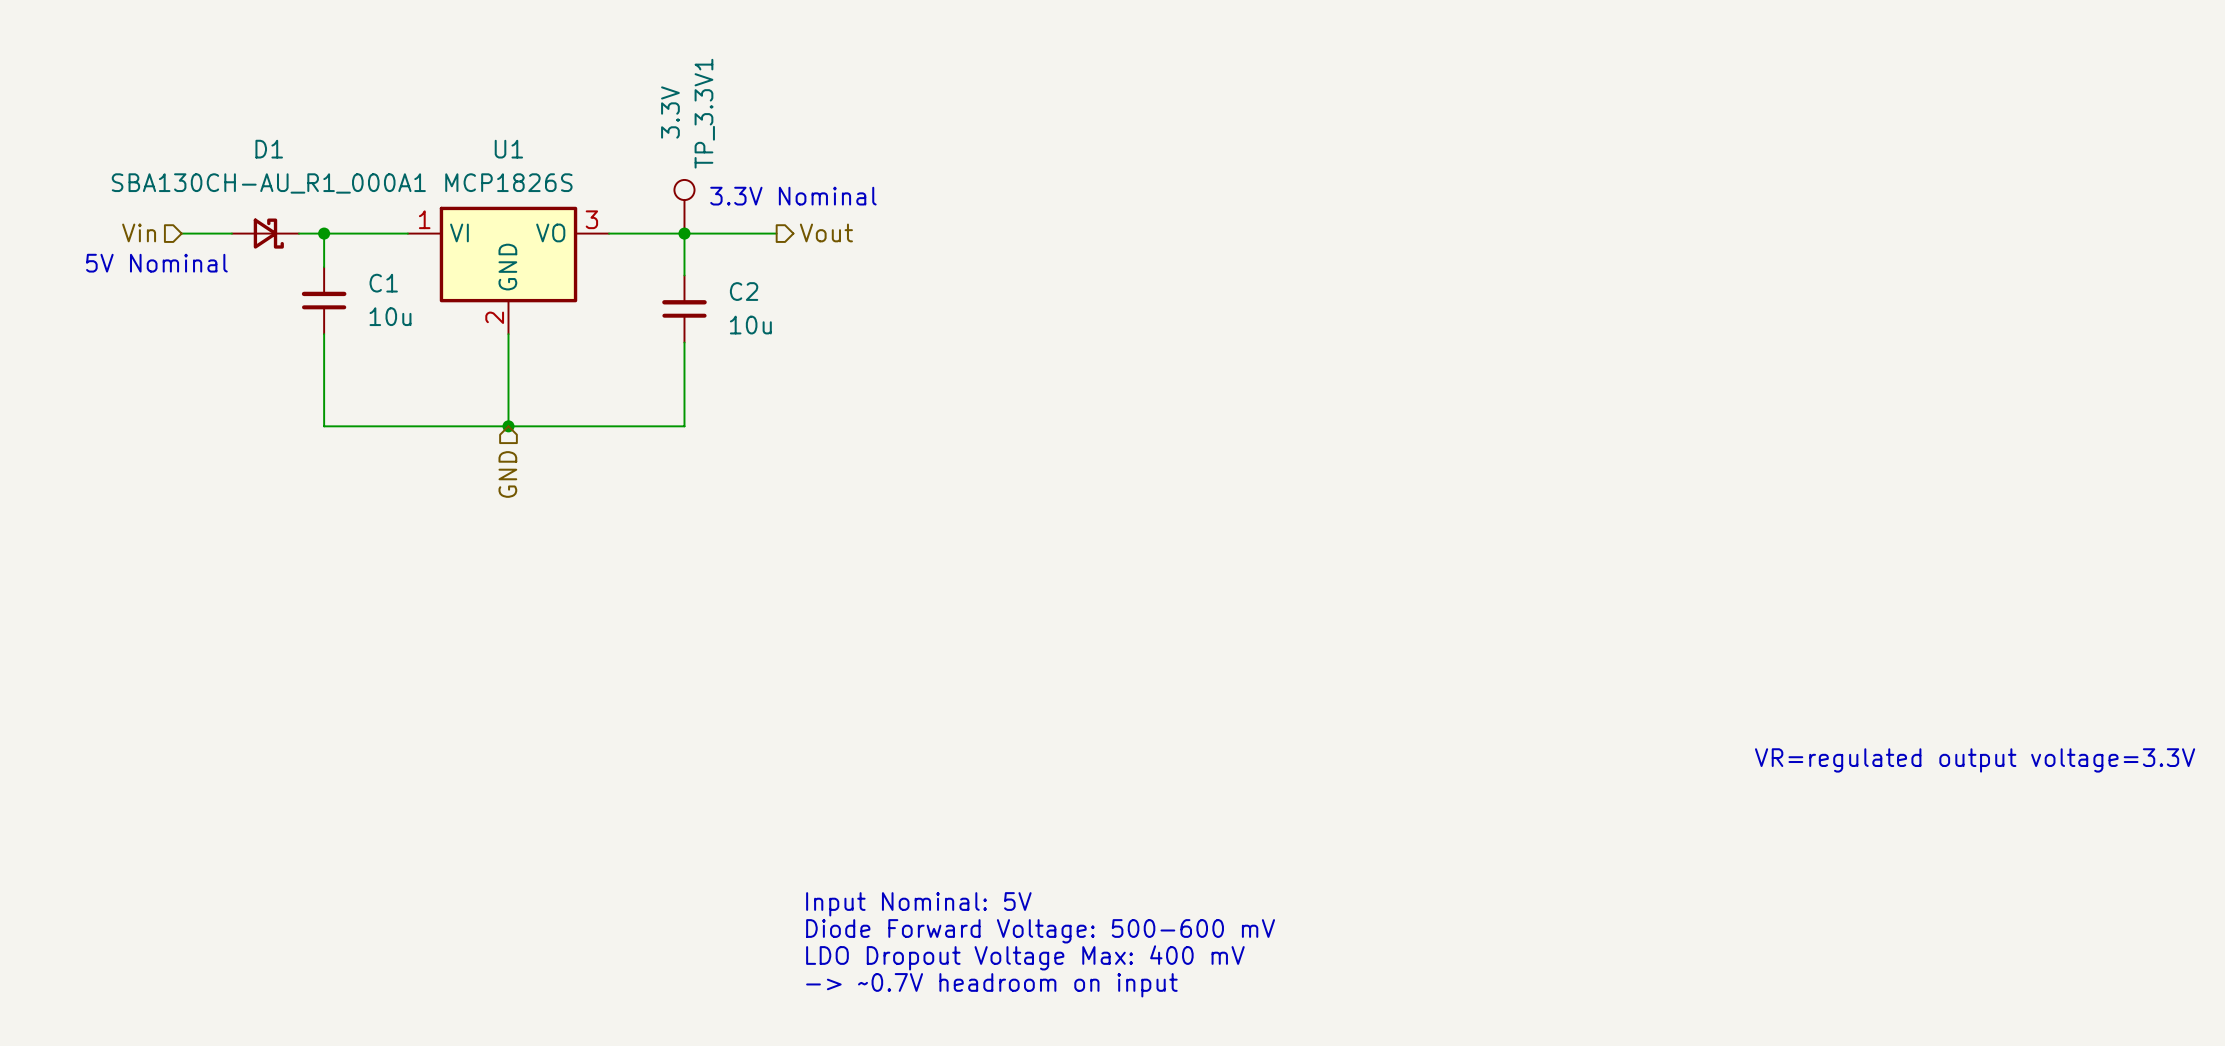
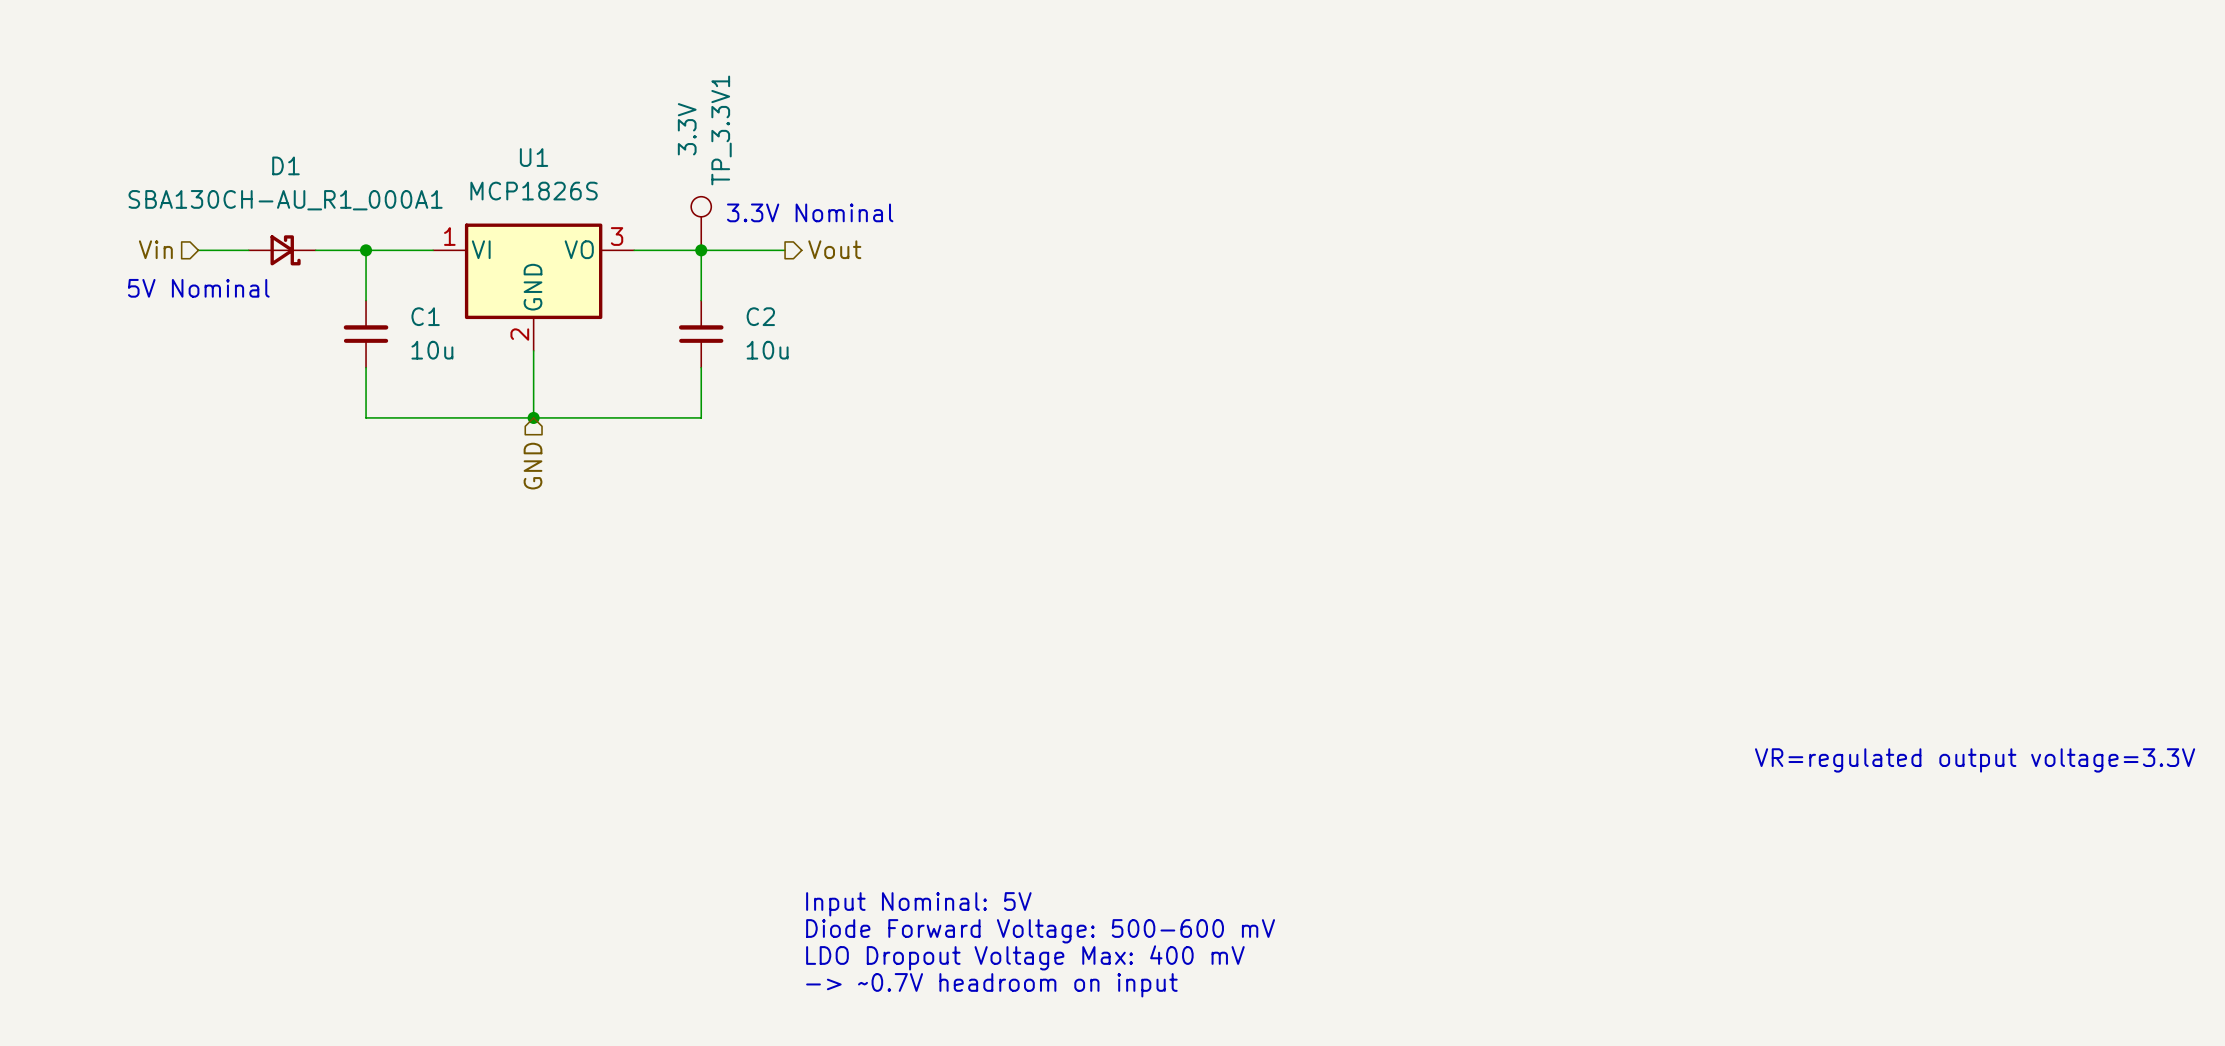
U1 name position: U1 (508, 149) -> U1 (534, 157)
U1 value position: MCP1826S (508, 182) -> MCP1826S (534, 191)
text position: 3.3V Nominal (793, 196) -> 3.3V Nominal (810, 212)
TP_3.3V1 position: (684, 206) -> (701, 223)
hierarchical label position: Vin (139, 232) -> Vin (155, 249)
hierarchical label position: Vout (826, 232) -> Vout (834, 249)
wire: (181, 233) (231, 233) -> (198, 250) (248, 250)
D1 position: (265, 233) -> (282, 250)
wire: (298, 233) (407, 233) -> none
wire: (324, 233) (324, 267) -> none
junction position: (324, 233) -> (366, 250)
wire: (609, 233) (776, 233) -> none
wire: (684, 233) (684, 275) -> none
junction position: (684, 233) -> (701, 250)
wire: none -> (315, 250) (433, 250)
wire: none -> (366, 250) (366, 300)
wire: none -> (634, 250) (785, 250)
wire: none -> (701, 250) (701, 300)
text position: 5V Nominal (156, 263) -> 5V Nominal (198, 288)
U1 position: (508, 270) -> (533, 287)
C1 position: (324, 300) -> (366, 334)
C2 position: (684, 309) -> (701, 334)
wire: (324, 334) (324, 426) (684, 426) (684, 342) -> none
wire: (508, 334) (508, 426) -> none
wire: none -> (533, 350) (533, 417)
wire: none -> (366, 367) (366, 417) (701, 417) (701, 367)
junction position: (508, 426) -> (533, 417)
hierarchical label position: GND (507, 474) -> GND (533, 466)

